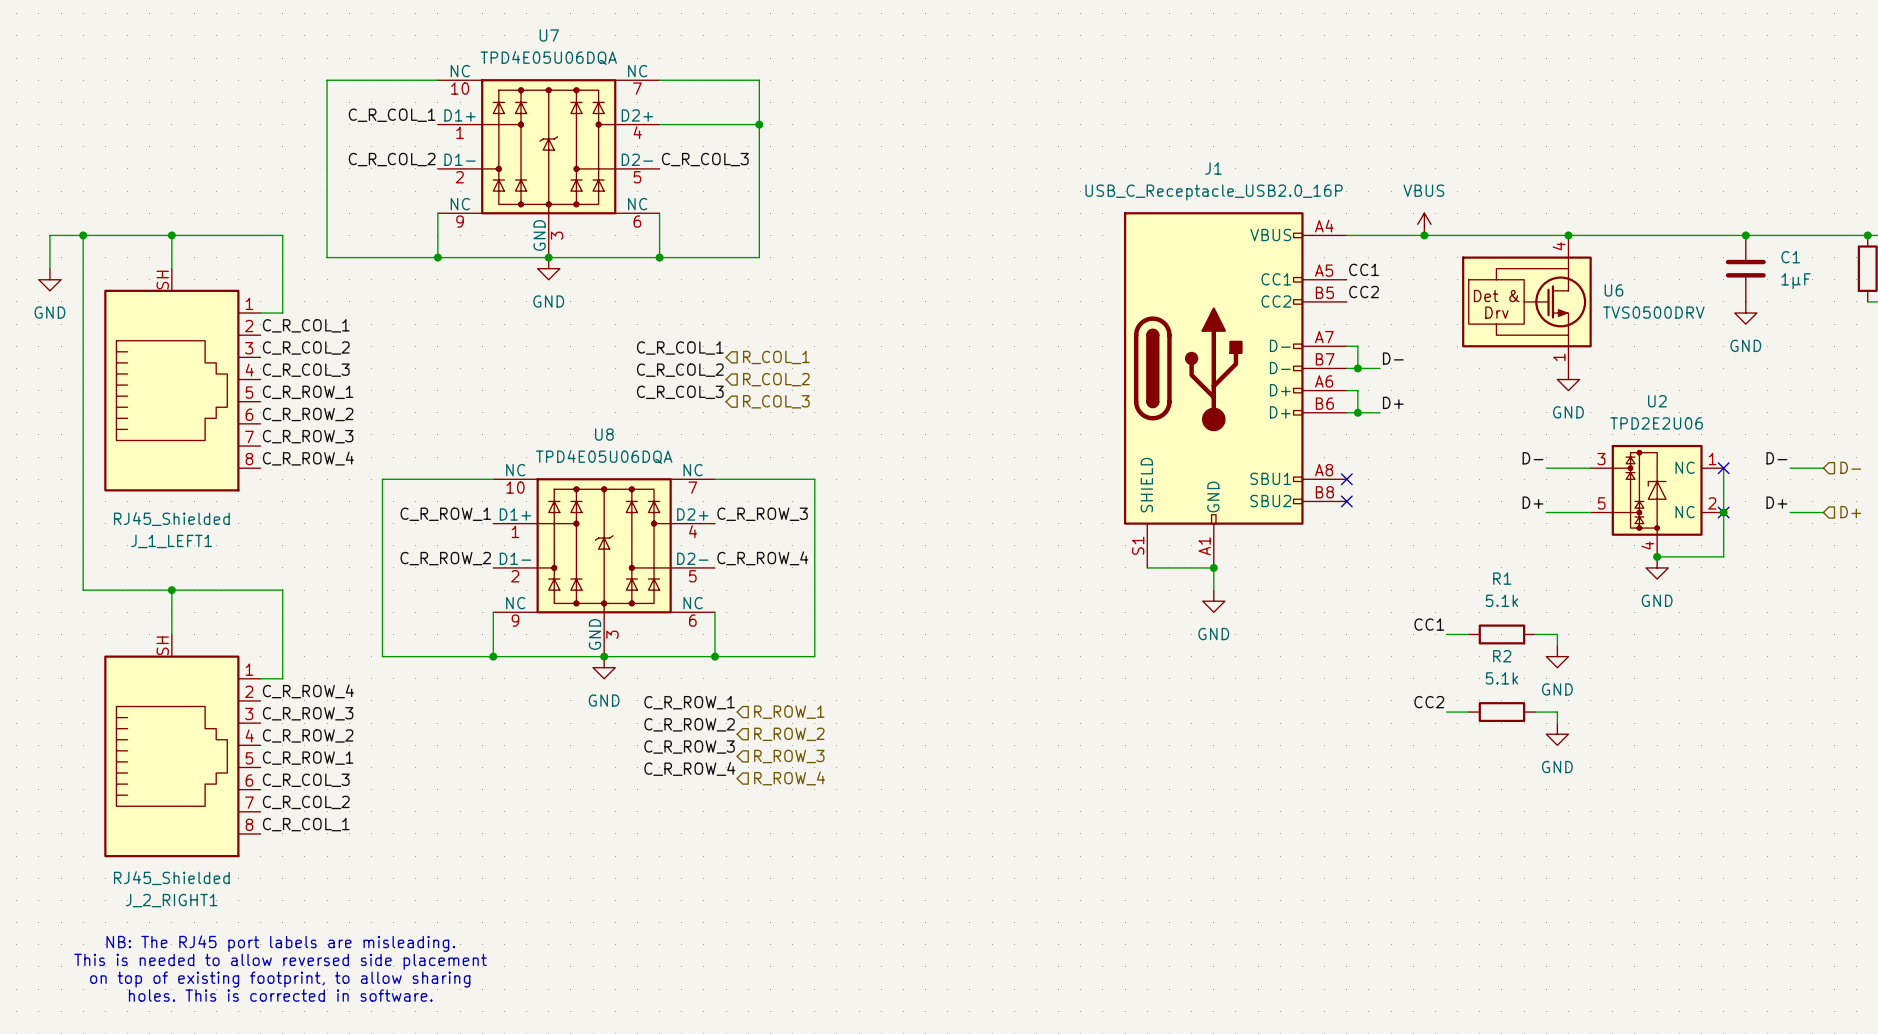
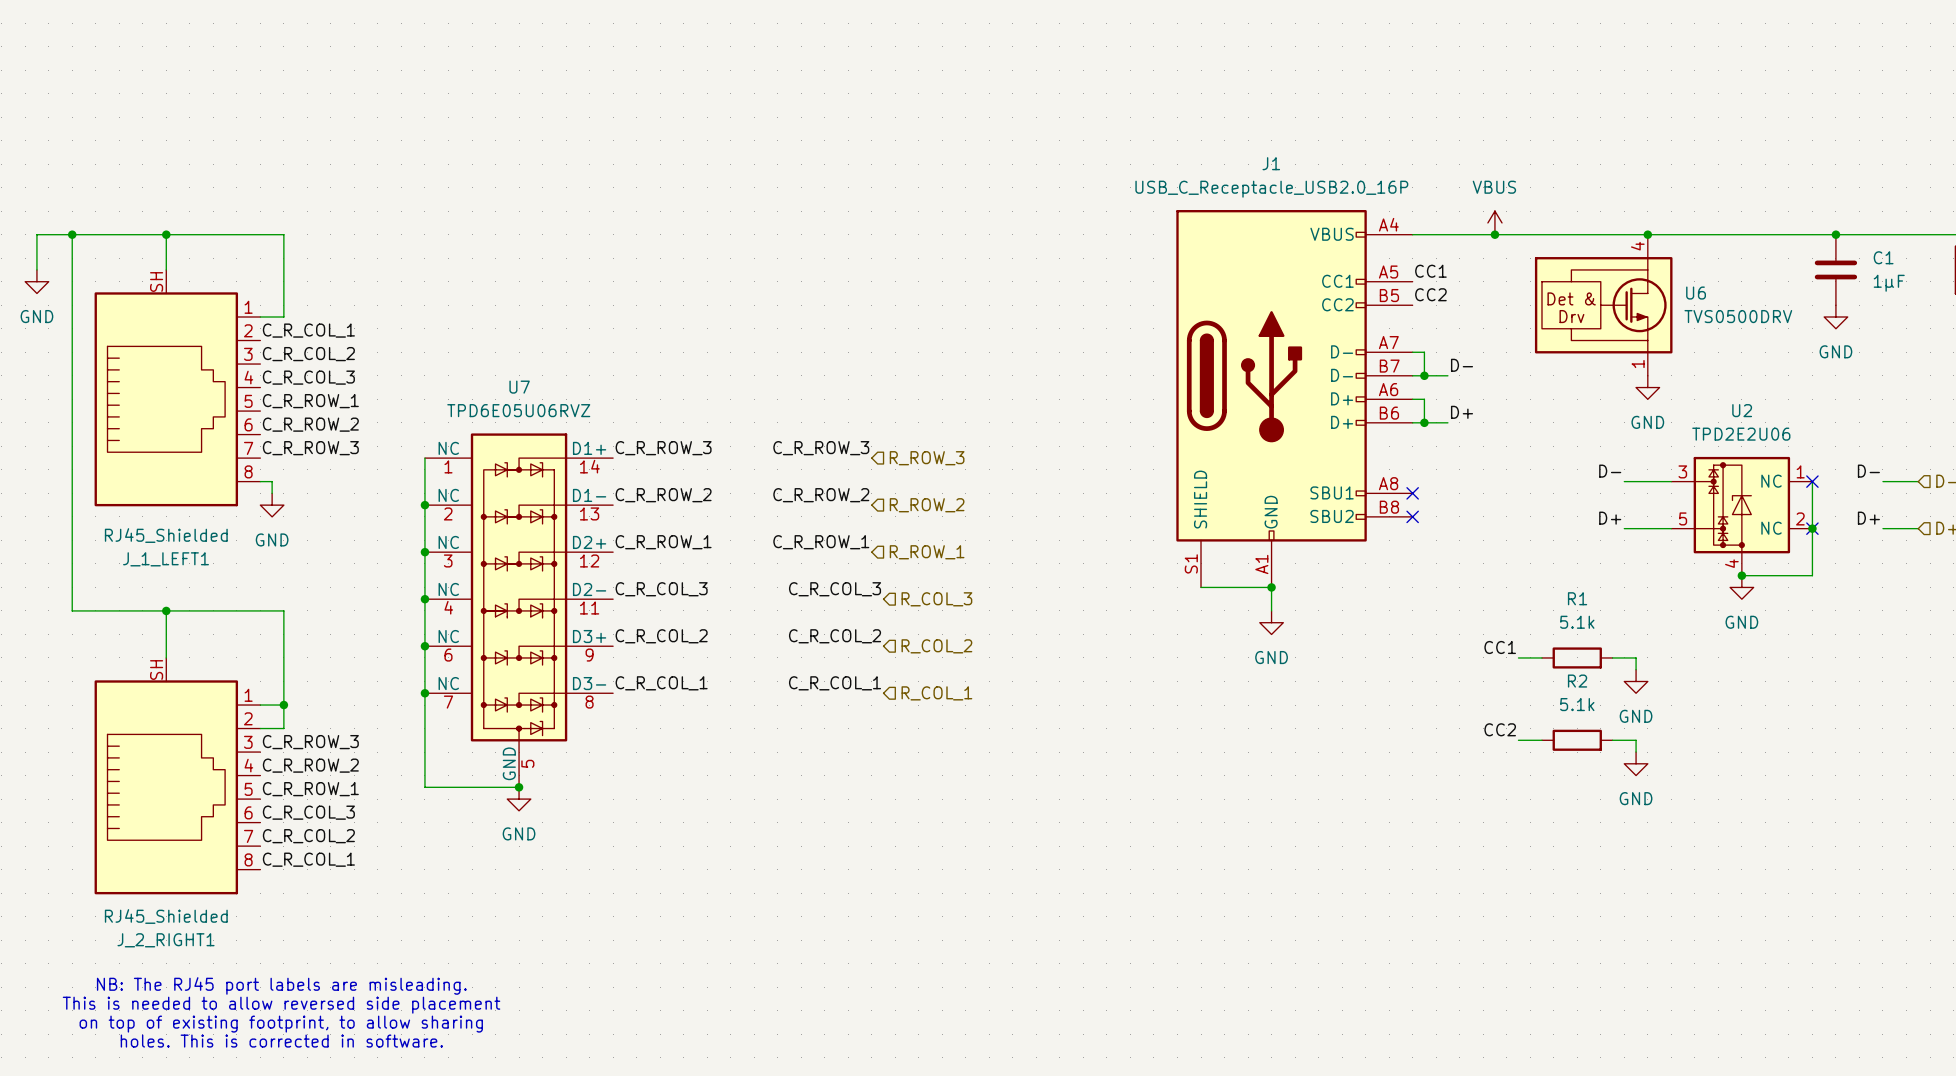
U7 name position: U7 (549, 35) -> U7 (519, 387)
U7 value: TPD4E05U06DQA (548, 57) -> TPD6E05U06RVZ (518, 410)
U7 symbol: [437, 79, 660, 258] -> [424, 433, 614, 788]
wire: (437, 80) (327, 80) (327, 257) (759, 257) (759, 80) (659, 80) -> none
label: C_R_COL_1 (392, 115) -> none
wire: (659, 124) (759, 124) -> none
junction: (759, 124) -> none
label: C_R_COL_2 (392, 159) -> none
label: C_R_COL_3 (705, 159) -> none
wire: (437, 213) (437, 257) -> none
wire: (659, 213) (659, 257) -> none
junction: (437, 257) -> none
junction: (548, 257) -> none
junction: (659, 257) -> none
power symbol: GND (548, 268) -> none
label: C_R_COL_1 (680, 347) -> none
hierarchical label: R_COL_1 (776, 357) -> none
label: C_R_COL_2 (680, 370) -> none
hierarchical label: R_COL_2 (776, 379) -> none
label: C_R_COL_3 (680, 392) -> none
hierarchical label position: R_COL_3 (776, 401) -> R_COL_3 (936, 599)
label: none -> C_R_ROW_3 (663, 448)
label: none -> C_R_ROW_3 (821, 448)
wire: none -> (424, 458) (424, 787) (519, 787)
hierarchical label: none -> R_ROW_3 (927, 458)
label: C_R_ROW_4 (308, 458) -> none
wire: none -> (260, 481) (272, 481) (272, 493)
wire: (493, 479) (382, 479) (382, 656) (814, 656) (814, 479) (714, 479) -> none
label: none -> C_R_ROW_2 (821, 495)
power symbol: none -> GND (272, 505)
junction: none -> (424, 505)
hierarchical label: none -> R_ROW_2 (927, 505)
label position: C_R_ROW_1 (445, 514) -> C_R_ROW_1 (663, 542)
label: C_R_ROW_3 (762, 514) -> C_R_ROW_1 (821, 542)
junction: none -> (424, 552)
label position: C_R_ROW_2 (445, 558) -> C_R_ROW_2 (663, 495)
label: C_R_ROW_4 (762, 558) -> C_R_COL_3 (835, 589)
U8: TPD4E05U06DQA (604, 567) -> none
label: none -> C_R_COL_3 (661, 589)
junction: none -> (424, 599)
wire: (714, 612) (714, 656) -> none
label: none -> C_R_COL_2 (661, 636)
label: none -> C_R_COL_2 (835, 636)
junction: none -> (424, 646)
hierarchical label: none -> R_COL_2 (936, 646)
junction: (493, 656) -> none
junction: (604, 656) -> none
junction: (714, 656) -> none
label: none -> C_R_COL_1 (661, 683)
label: none -> C_R_COL_1 (835, 683)
junction: none -> (424, 693)
power symbol position: GND (604, 667) -> GND (519, 799)
hierarchical label: none -> R_COL_1 (936, 693)
wire: none -> (283, 705) (283, 728) (260, 728)
junction: none -> (283, 705)
label: C_R_ROW_4 (308, 691) -> none
label: C_R_ROW_1 (689, 702) -> none
hierarchical label position: R_ROW_1 (789, 712) -> R_ROW_1 (927, 552)
label: C_R_ROW_2 (689, 724) -> none
hierarchical label: R_ROW_2 (789, 734) -> none
label: C_R_ROW_3 (689, 747) -> none
junction: none -> (519, 787)
hierarchical label: R_ROW_3 (789, 756) -> none
label: C_R_ROW_4 (689, 768) -> none
hierarchical label: R_ROW_4 (789, 778) -> none

